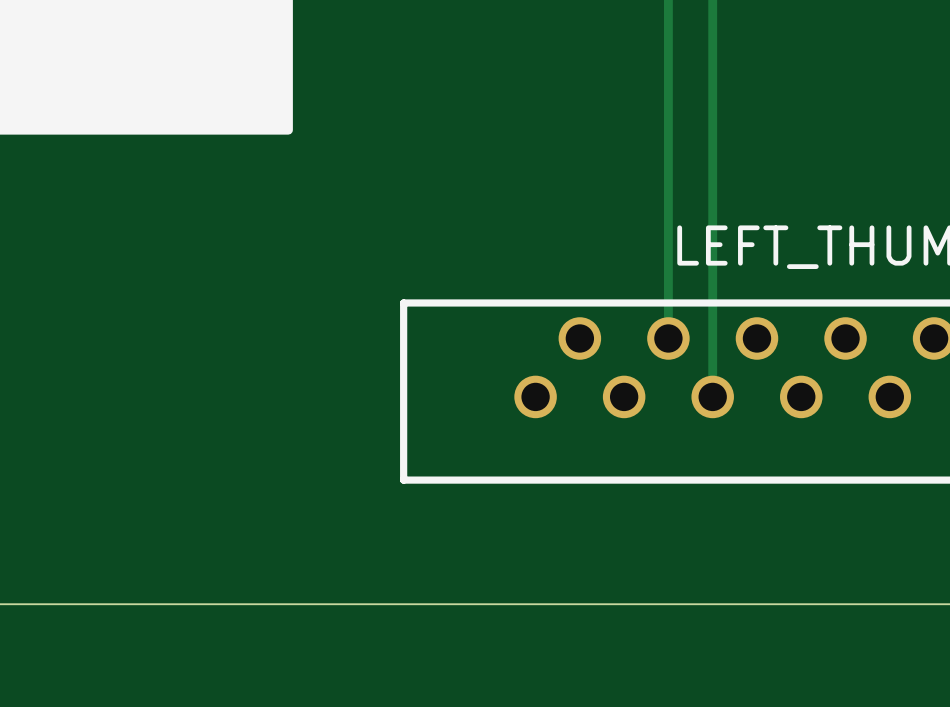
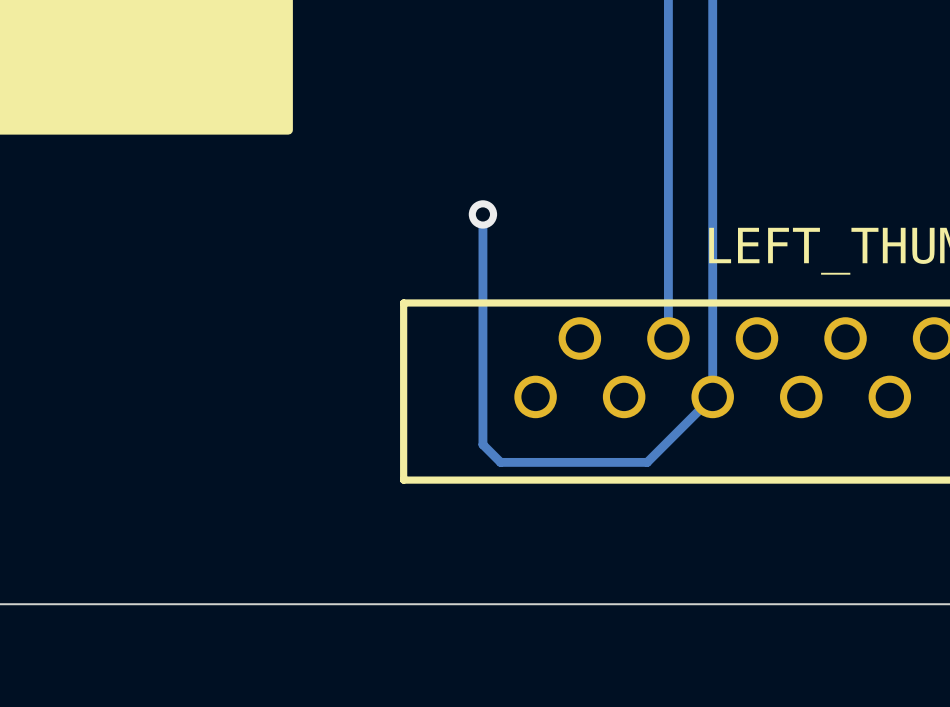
track: none -> (482, 214) (482, 444) (500, 462) (647, 462) (712, 396)
via: none -> (482, 214)

